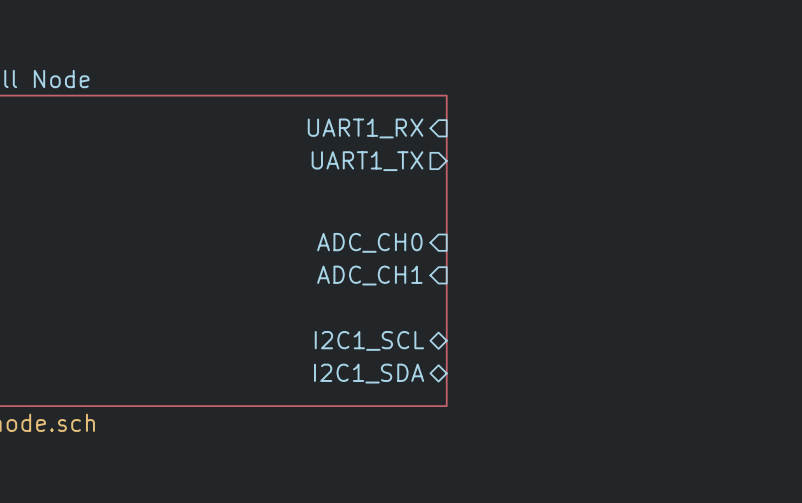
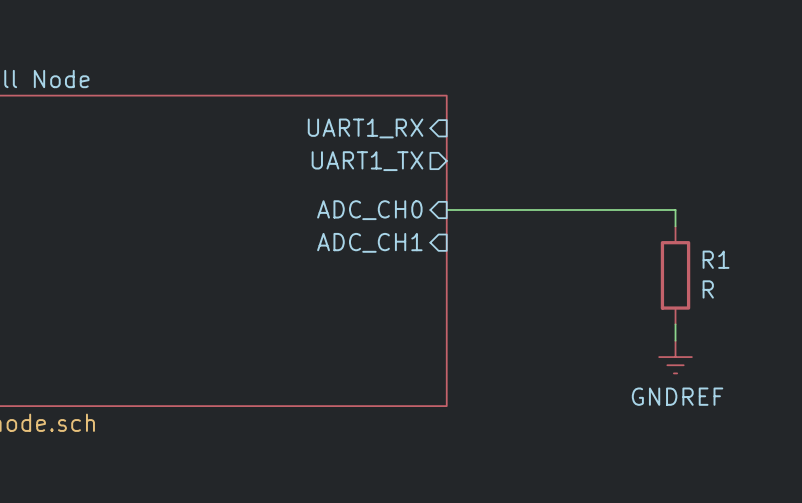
sheet pin: none -> ADC_CH0 (369, 210)
wire: none -> (446, 210) (675, 210) (675, 226)
sheet pin: ADC_CH0 (369, 242) -> ADC_CH1 (369, 242)
sheet pin: ADC_CH1 (369, 275) -> none
R1: none -> R (675, 275)
wire: none -> (675, 324) (675, 340)
sheet pin: I2C1_SCL (369, 340) -> none
power symbol: none -> GNDREF (675, 357)
sheet pin: I2C1_SDA (369, 373) -> none

